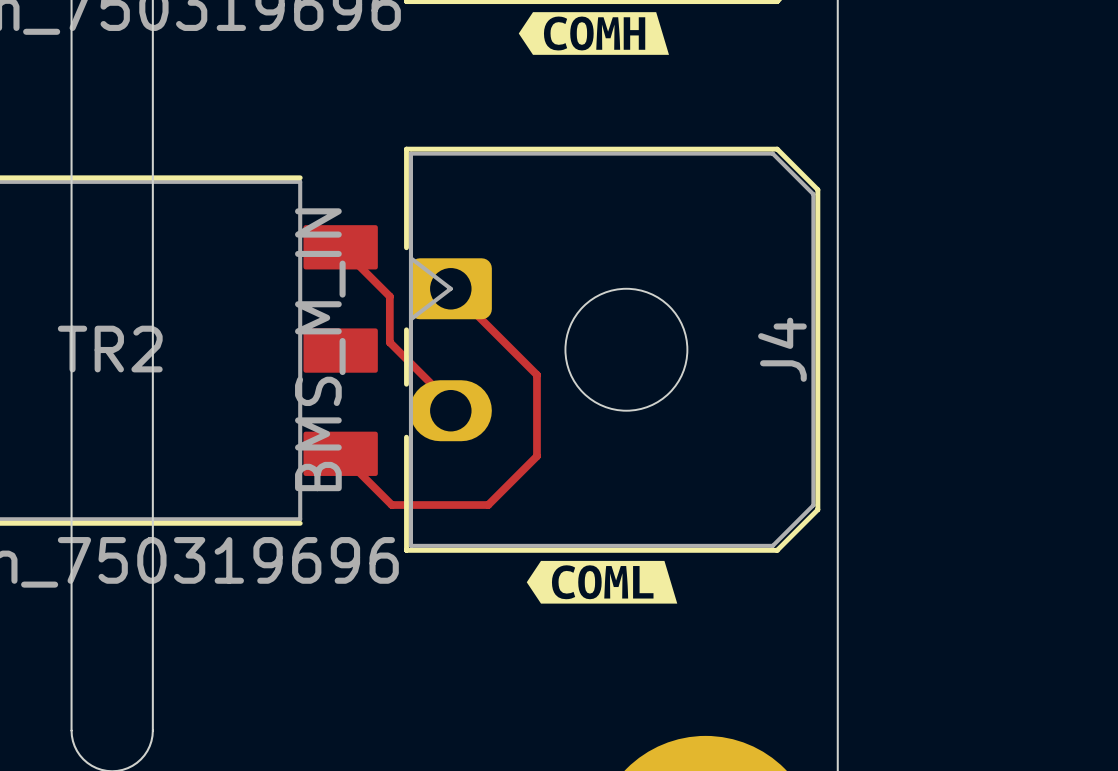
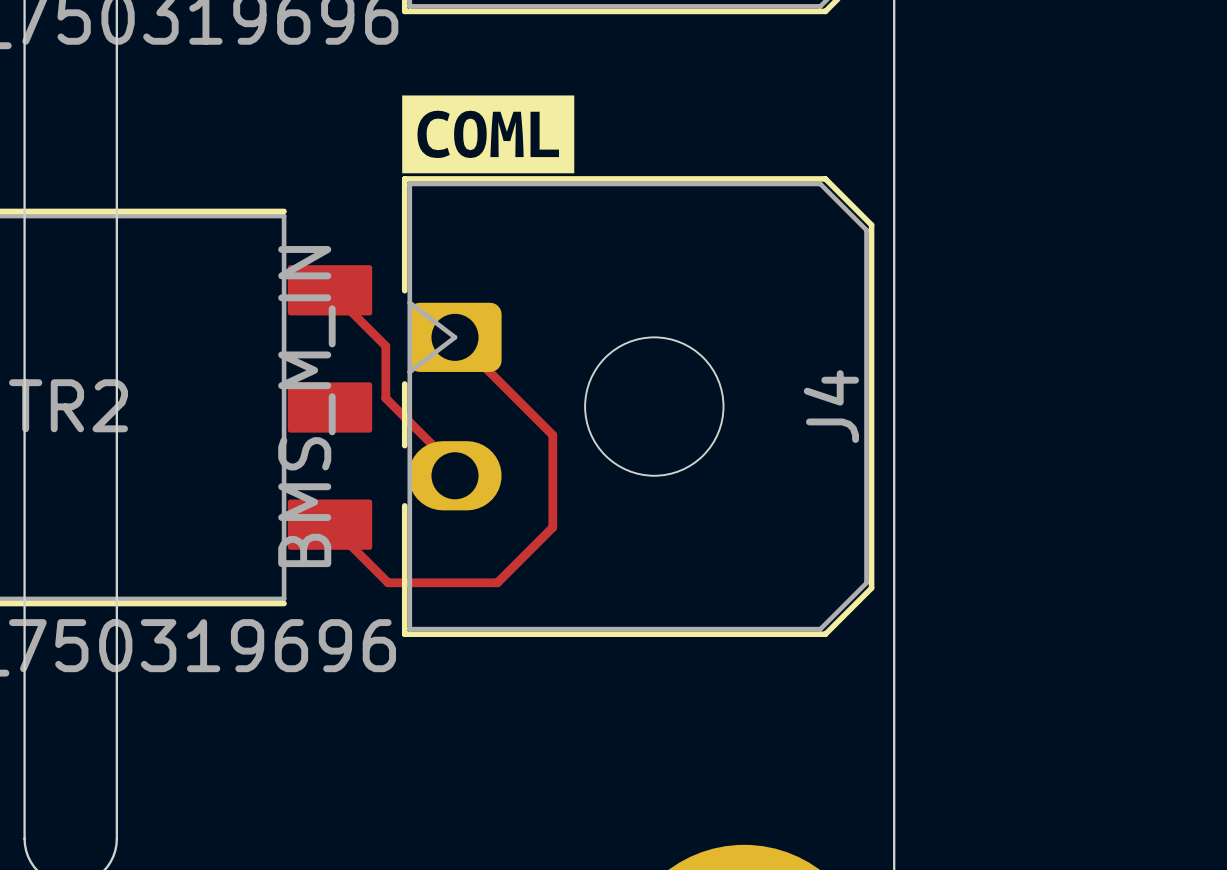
drawing: [518, 12, 669, 55] -> none
drawing: none -> [402, 95, 575, 174]
drawing: [526, 560, 678, 604] -> none

